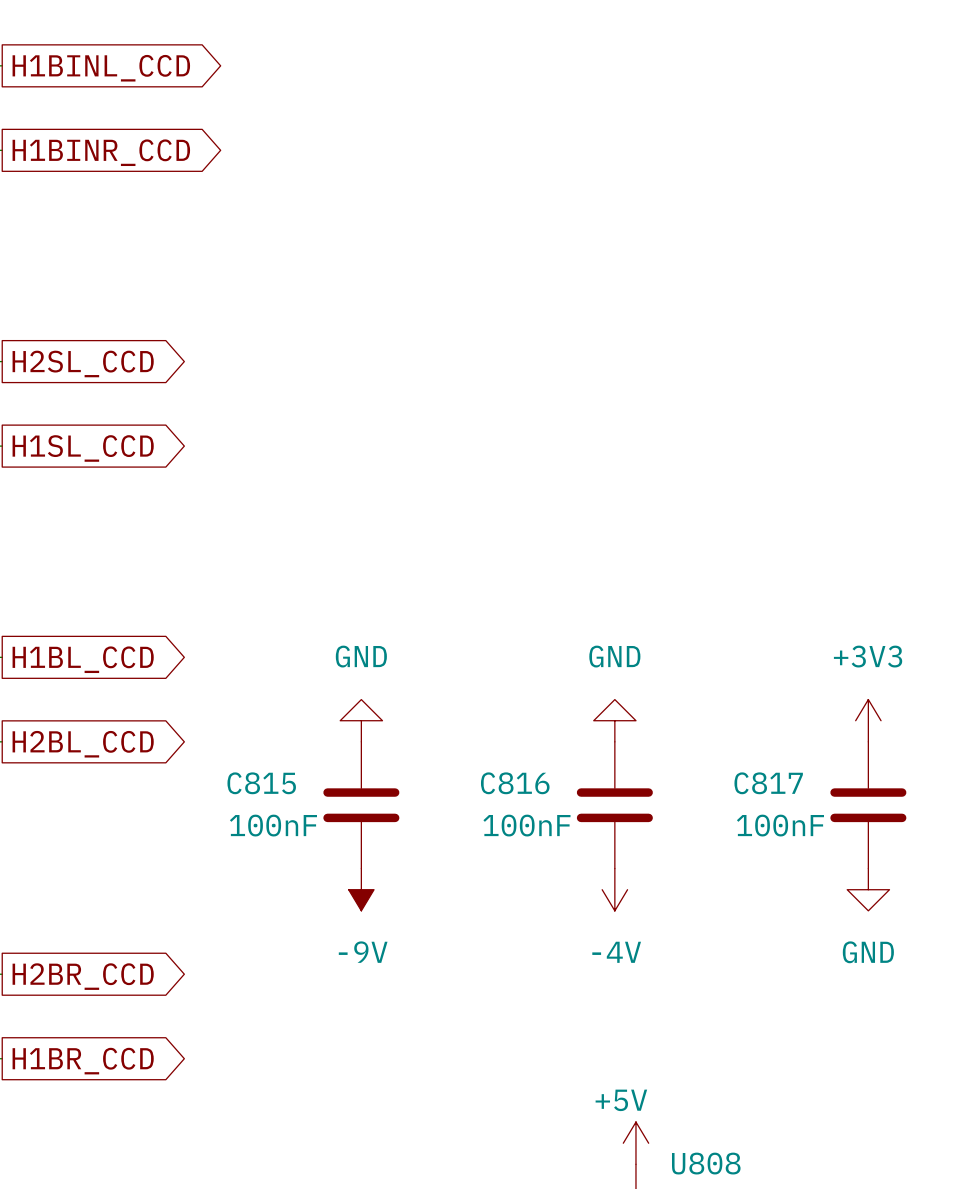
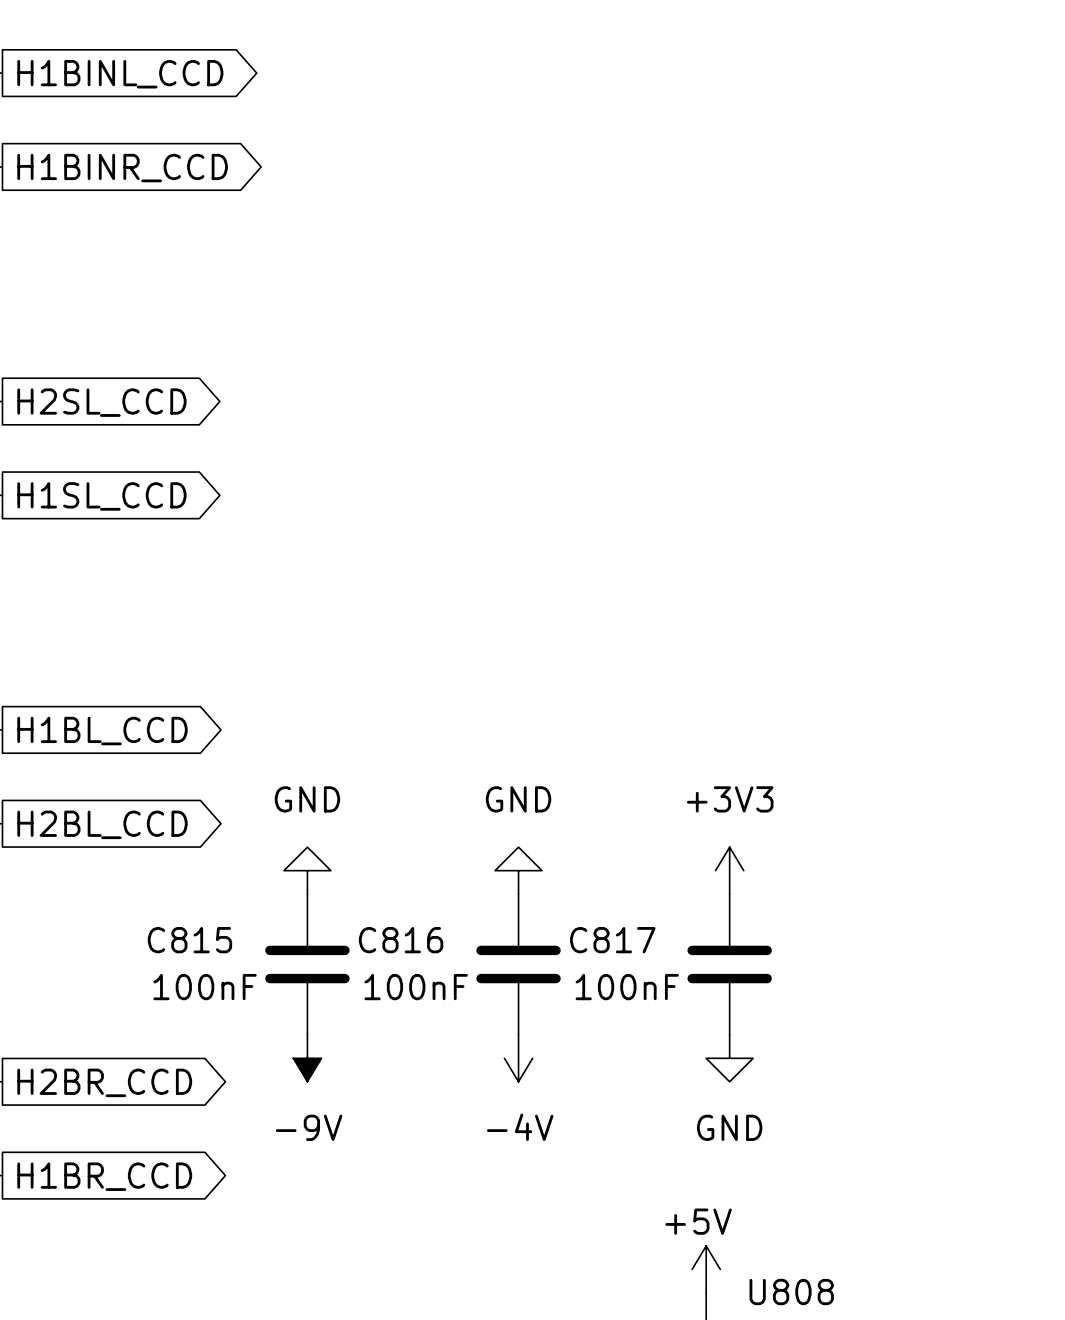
power symbol: GND (361, 720) -> none
power symbol: GND (614, 720) -> none
power symbol position: +3V3 (868, 720) -> +3V3 (729, 870)
power symbol: none -> GND (307, 870)
power symbol: none -> GND (518, 870)
C815 position: (361, 805) -> (307, 964)
C816 position: (614, 805) -> (518, 964)
C817 position: (868, 805) -> (729, 964)
power symbol position: -9V (361, 889) -> -9V (307, 1058)
power symbol position: -4V (614, 889) -> -4V (518, 1058)
power symbol: GND (868, 889) -> none
power symbol: none -> GND (729, 1058)

